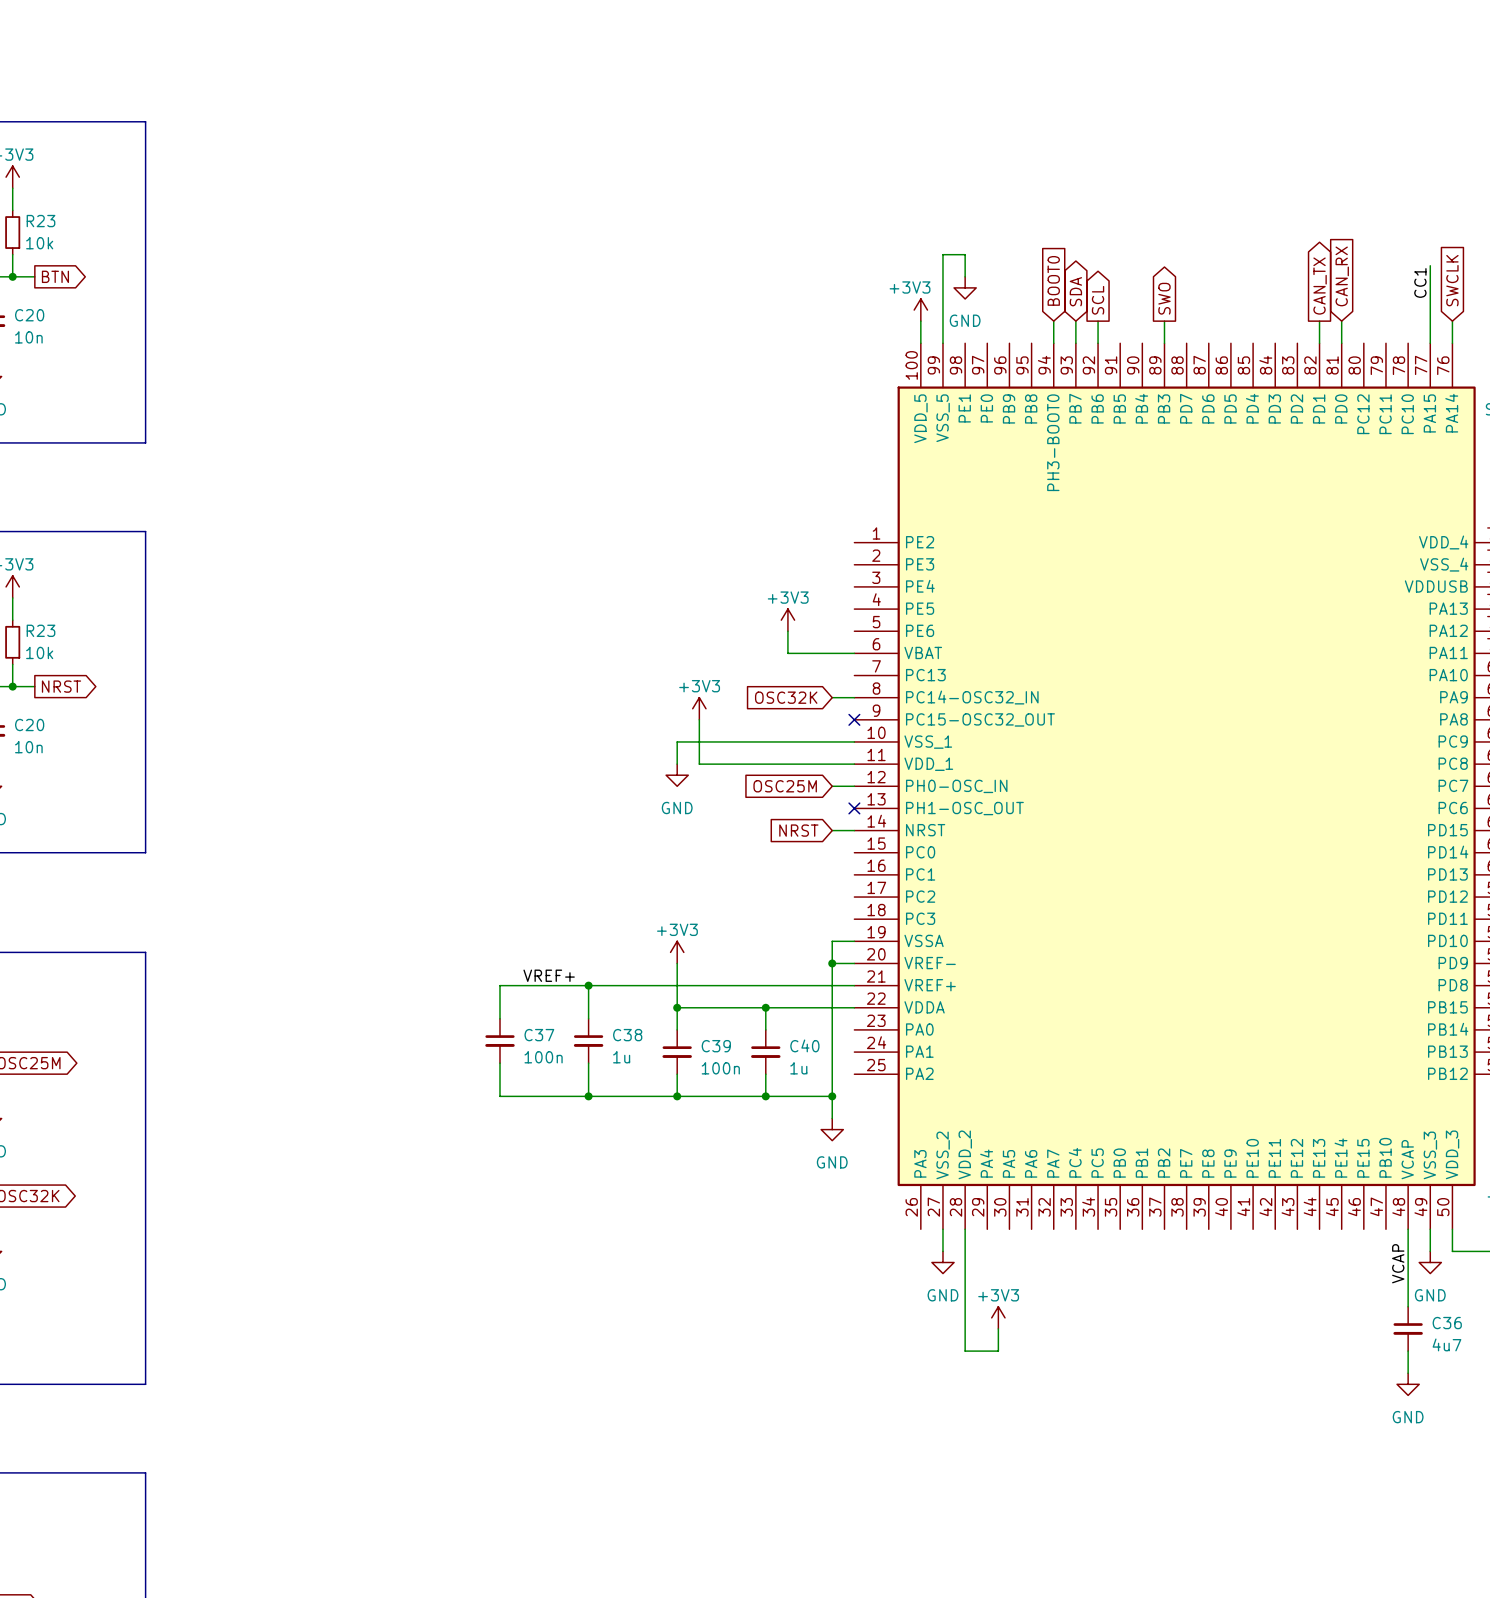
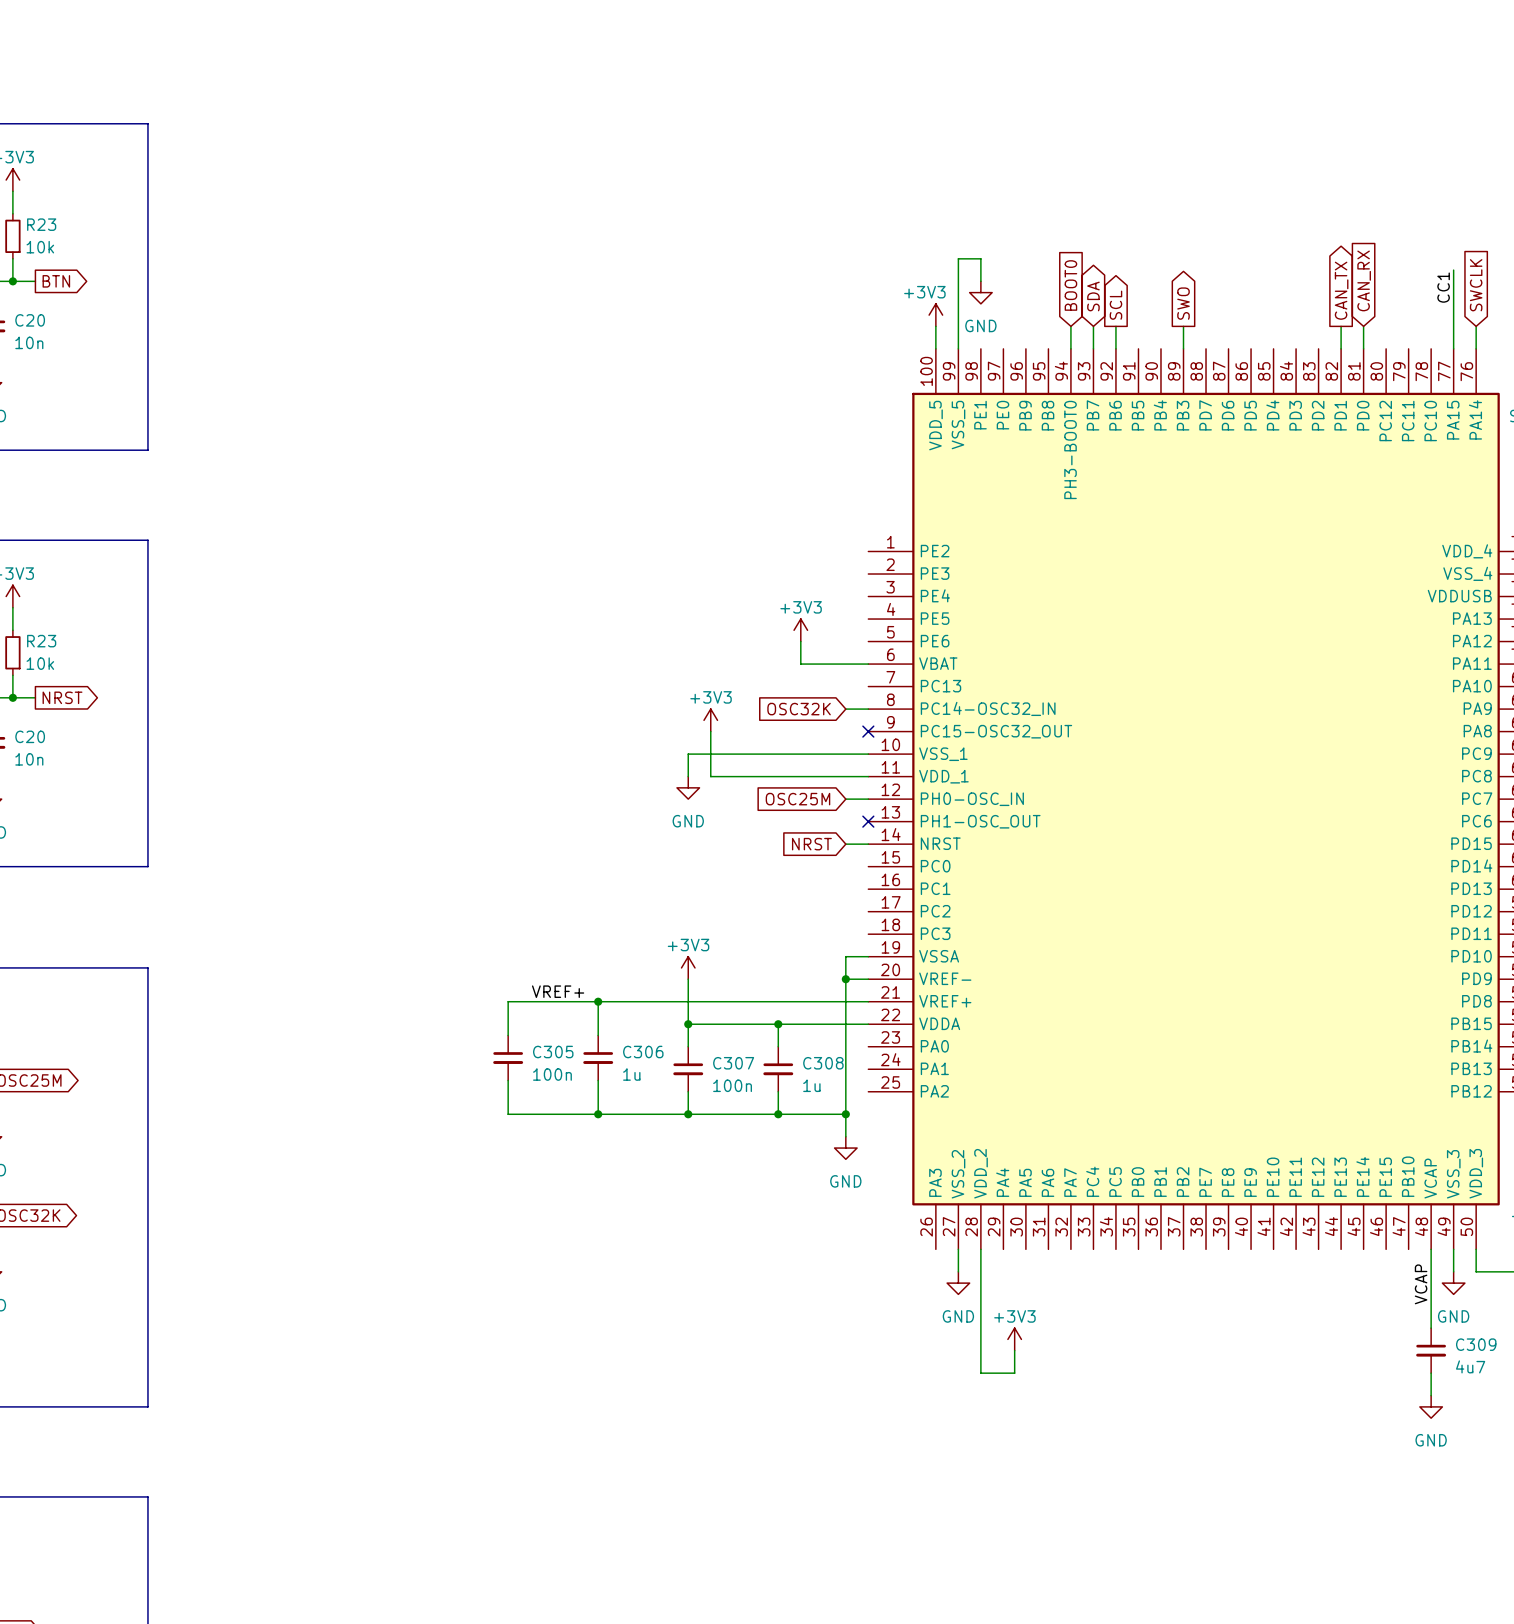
C37 name: C37 (539, 1035) -> C305 (553, 1052)
C38 name: C38 (627, 1035) -> C306 (643, 1052)
C40 name: C40 (804, 1045) -> C308 (823, 1063)
C39 name: C39 (716, 1046) -> C307 (733, 1063)
C36 name: C36 (1447, 1323) -> C309 (1476, 1344)

